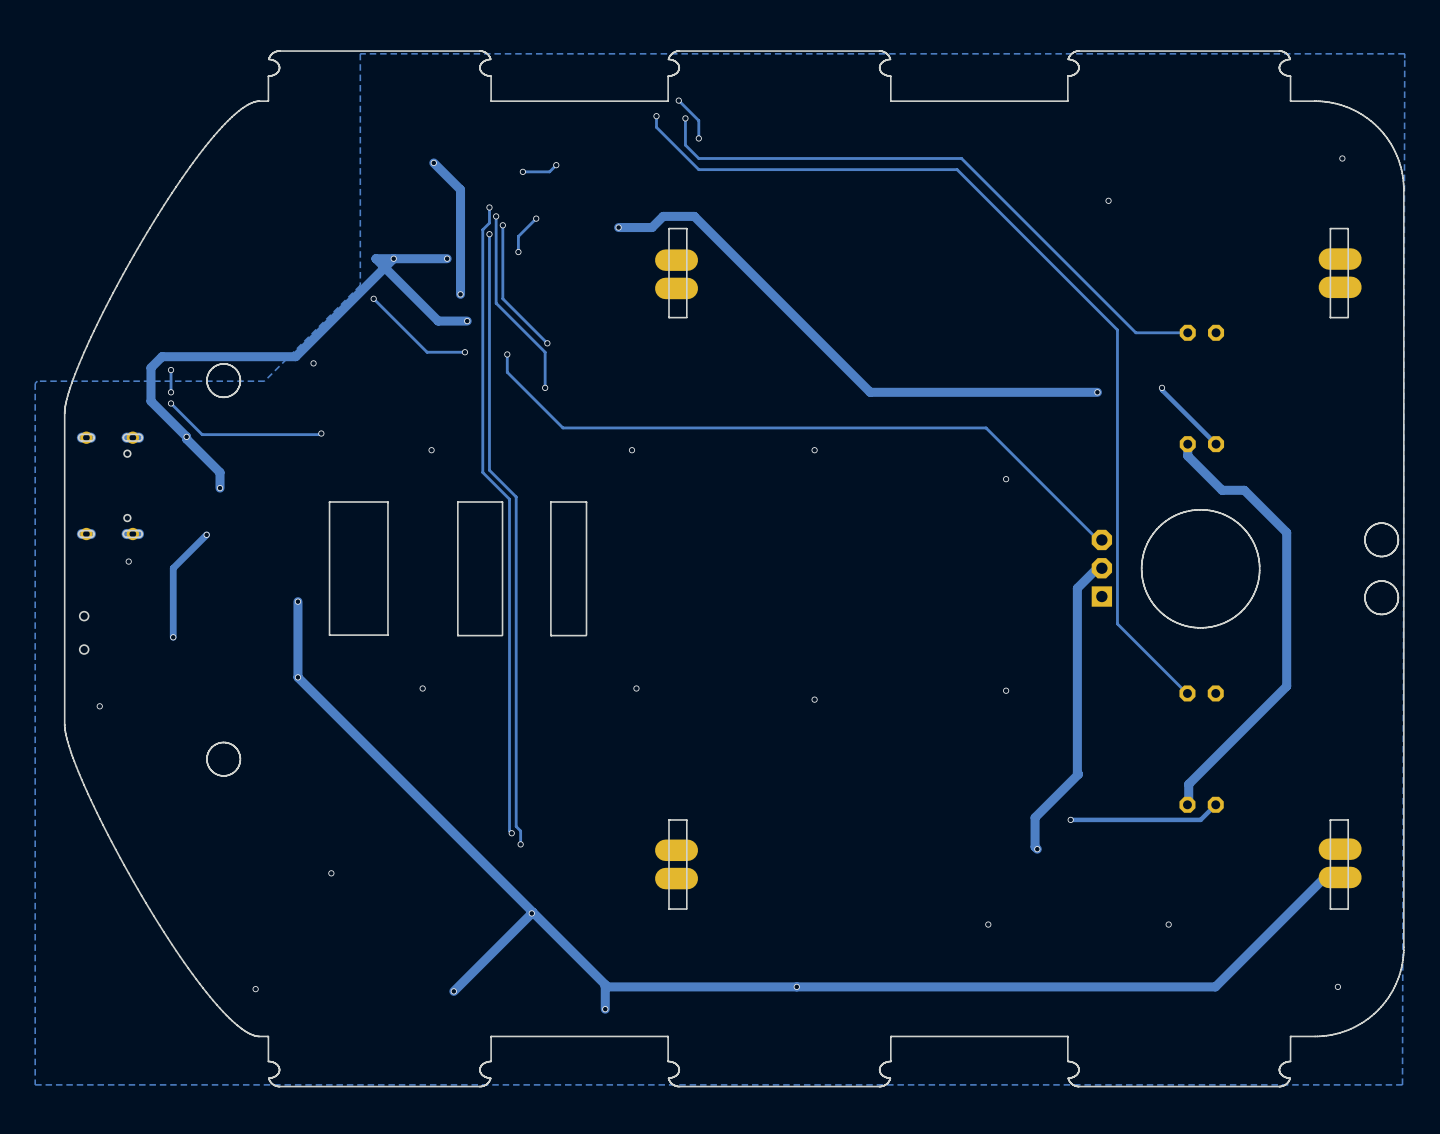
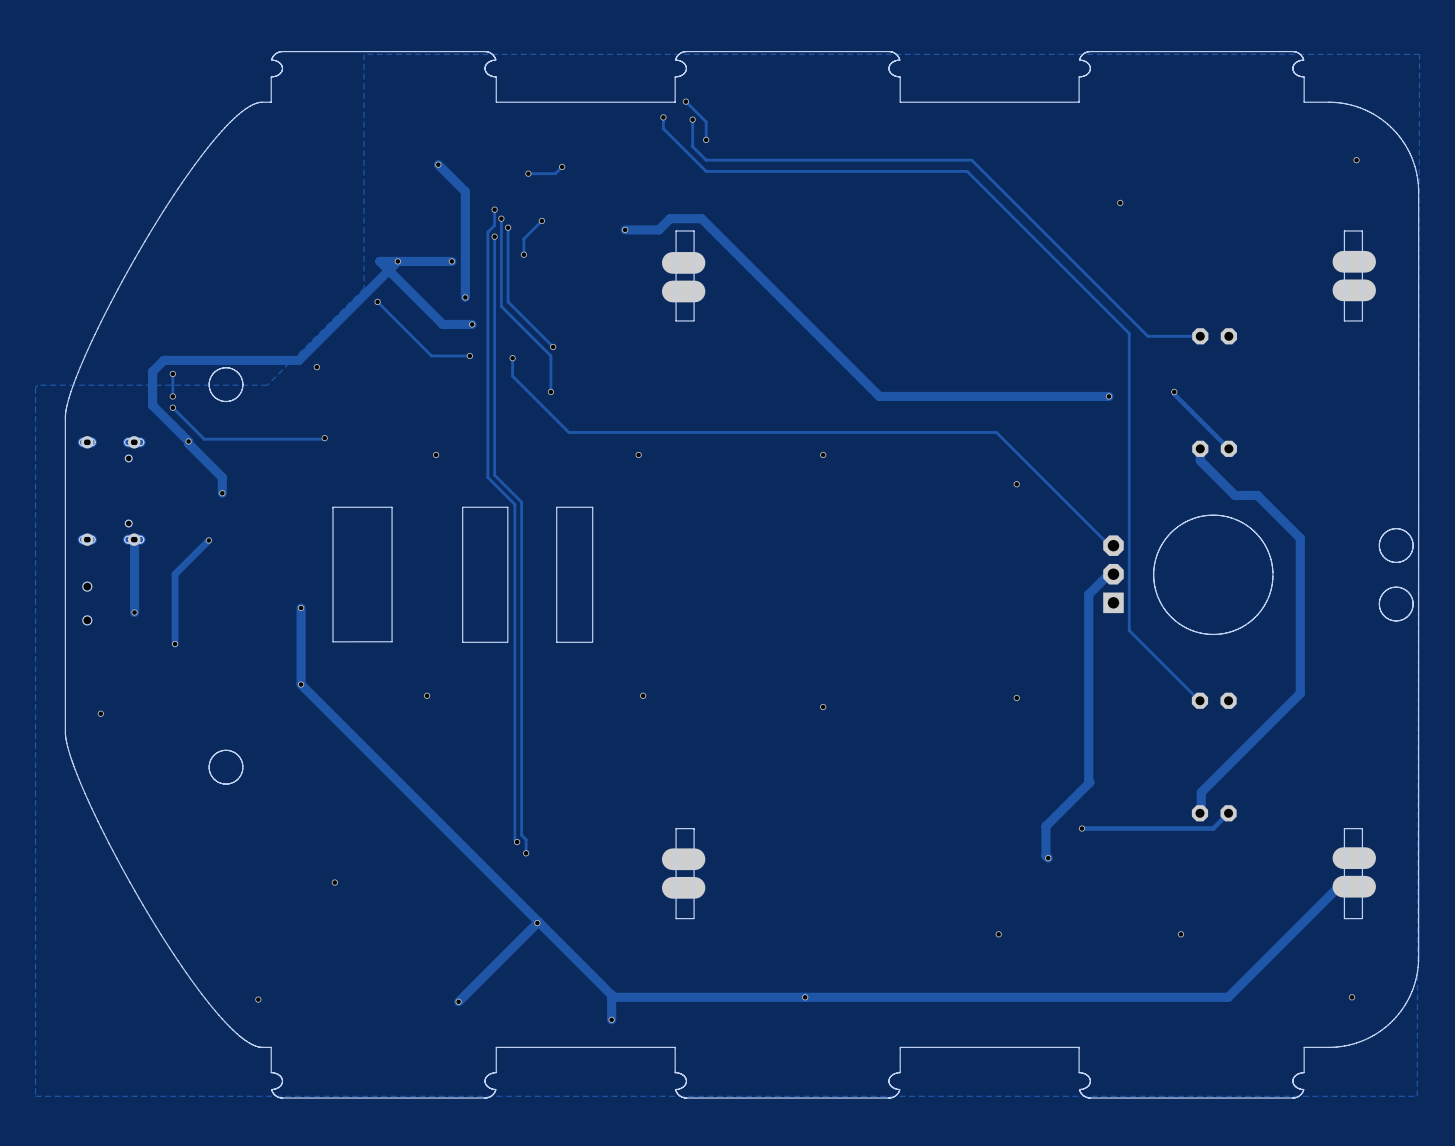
track: none -> (134, 539) (134, 612)
via position: (128, 561) -> (134, 612)
part position: (84, 632) -> (87, 603)

